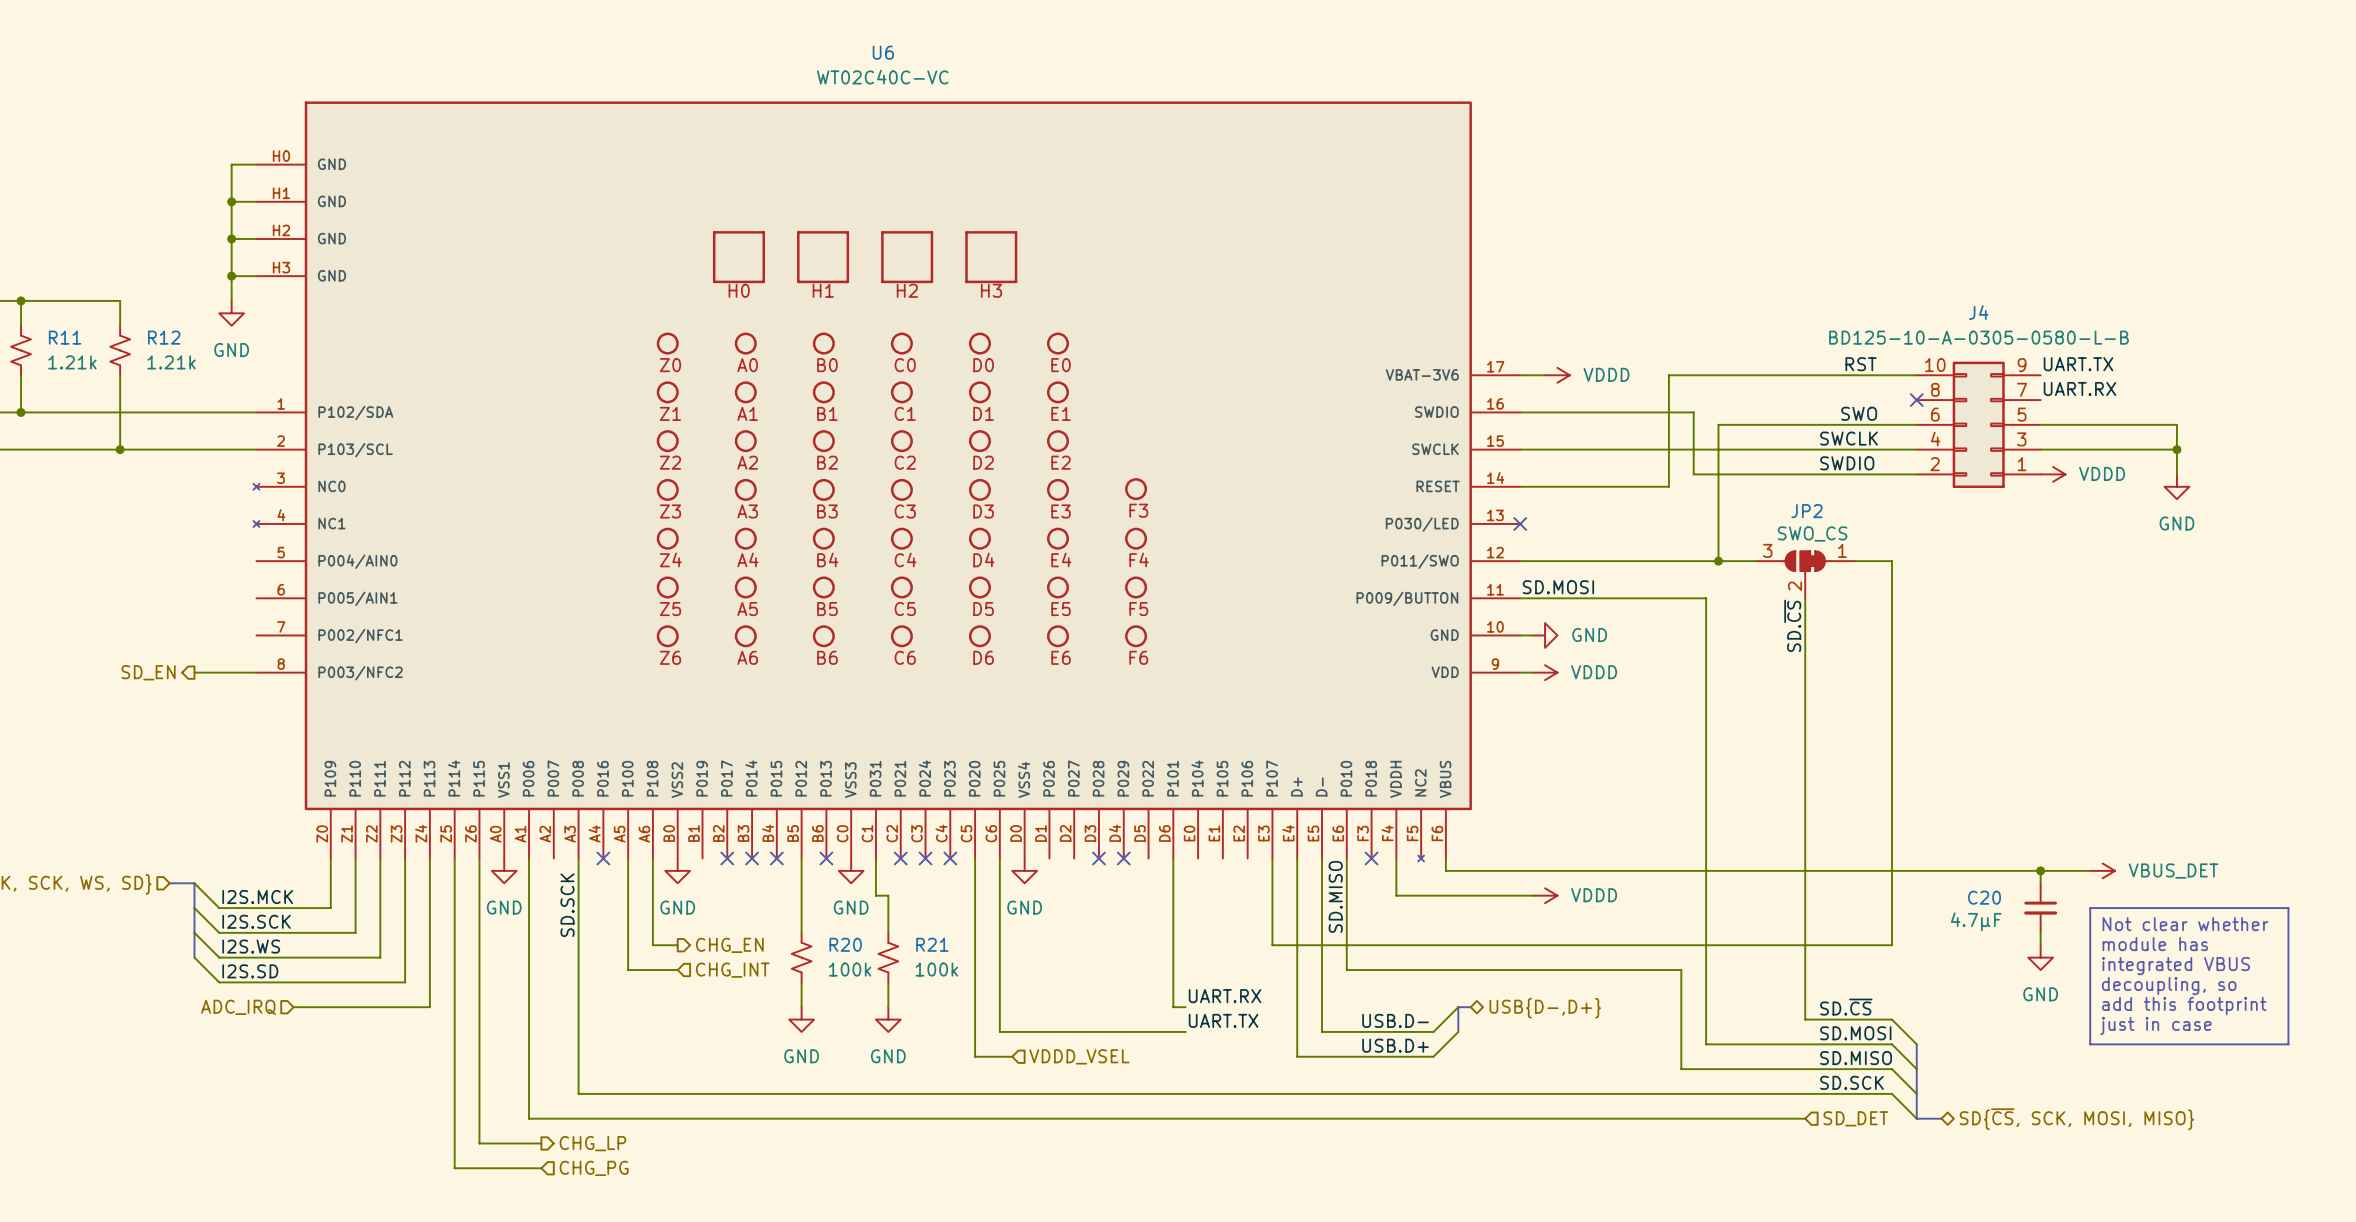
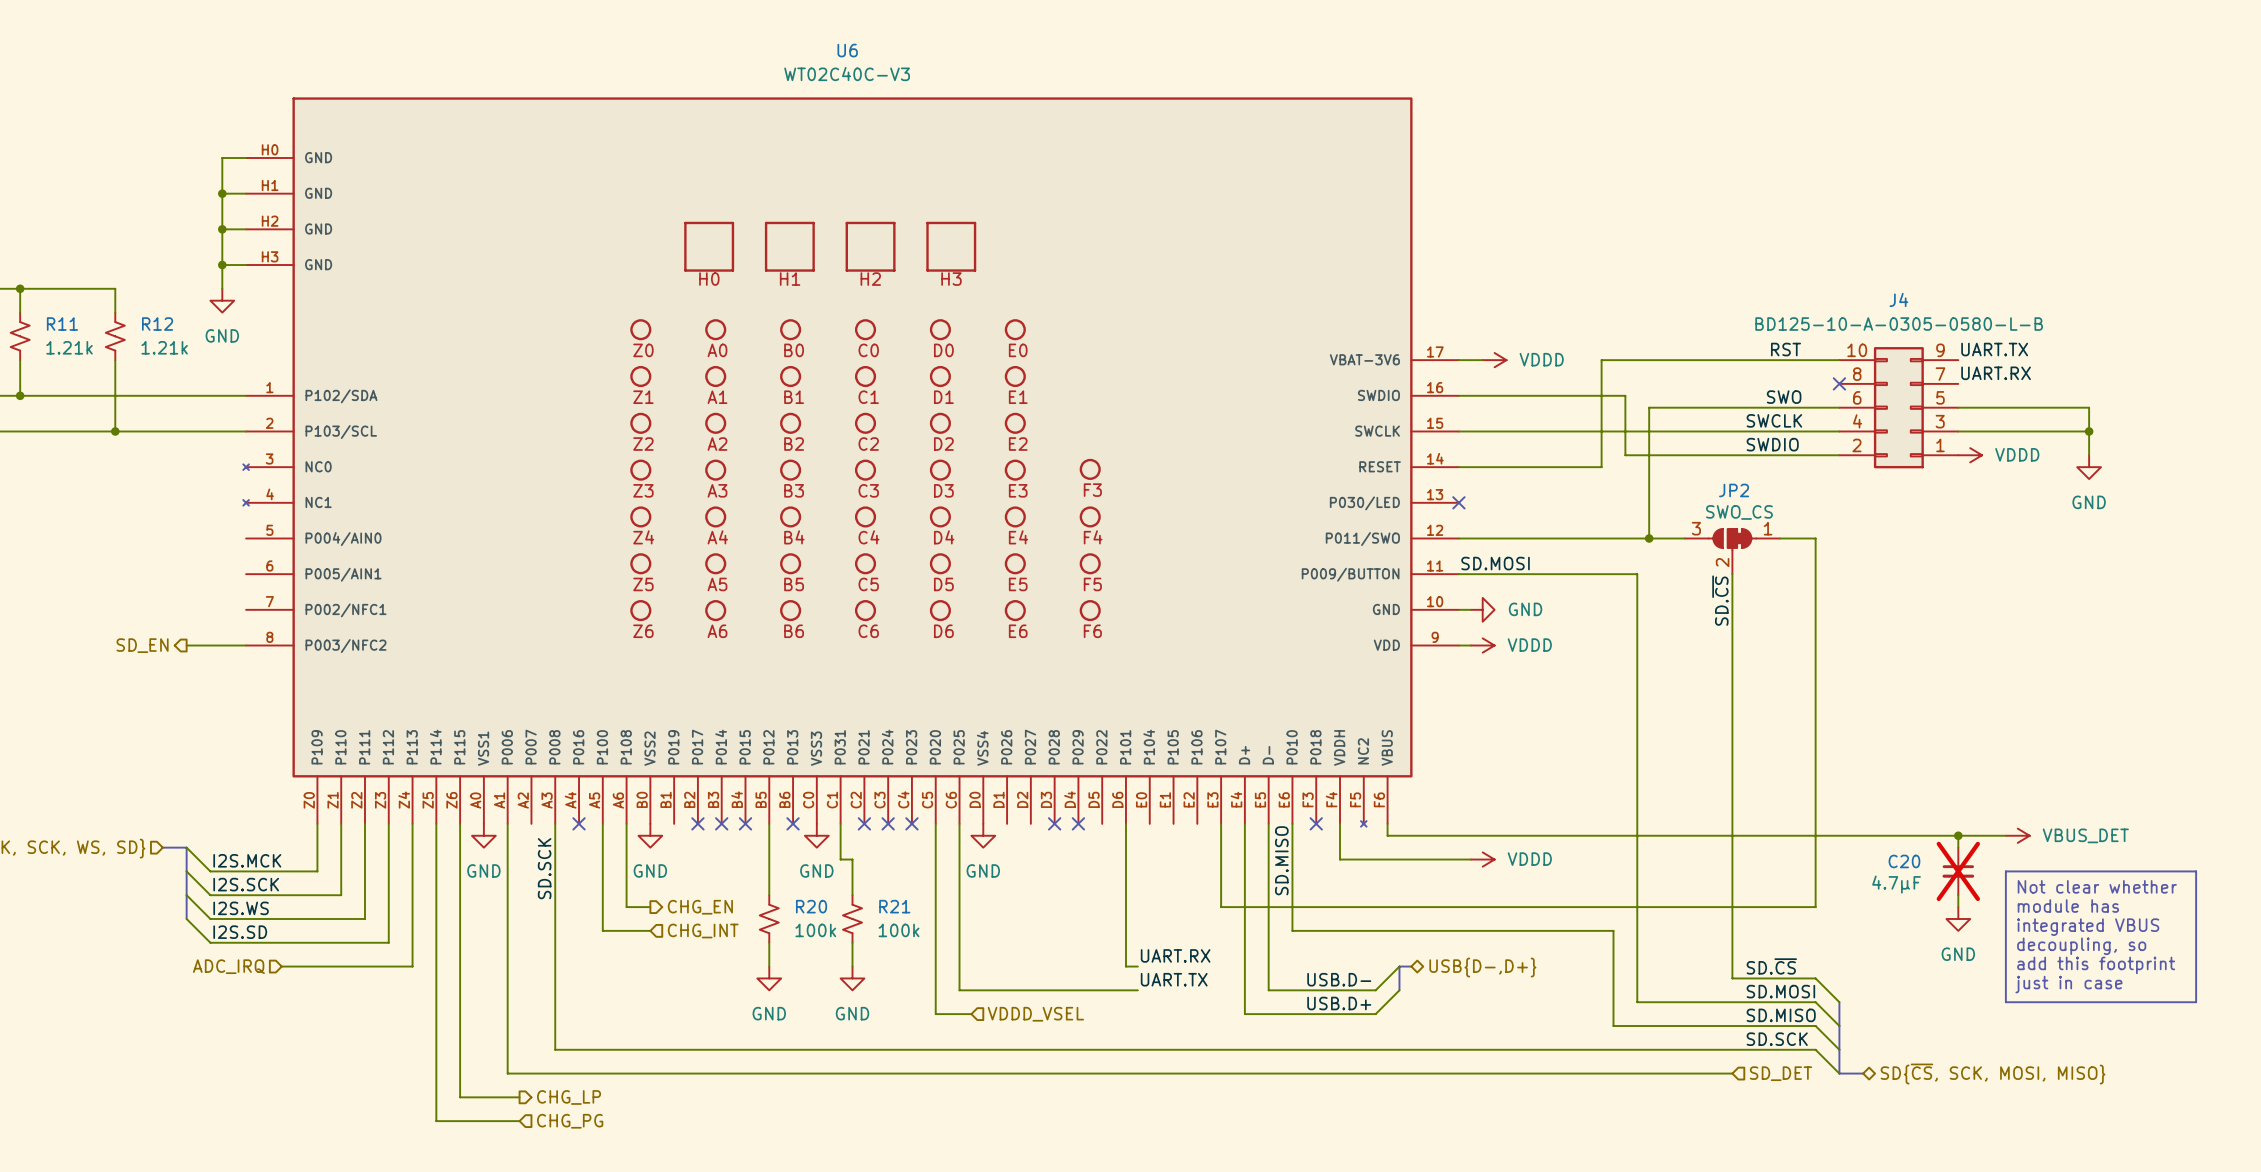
U6 value: WT02C40C-VC (882, 77) -> WT02C40C-V3 (847, 74)
C20 do-not-place cross: none -> (1958, 871)

